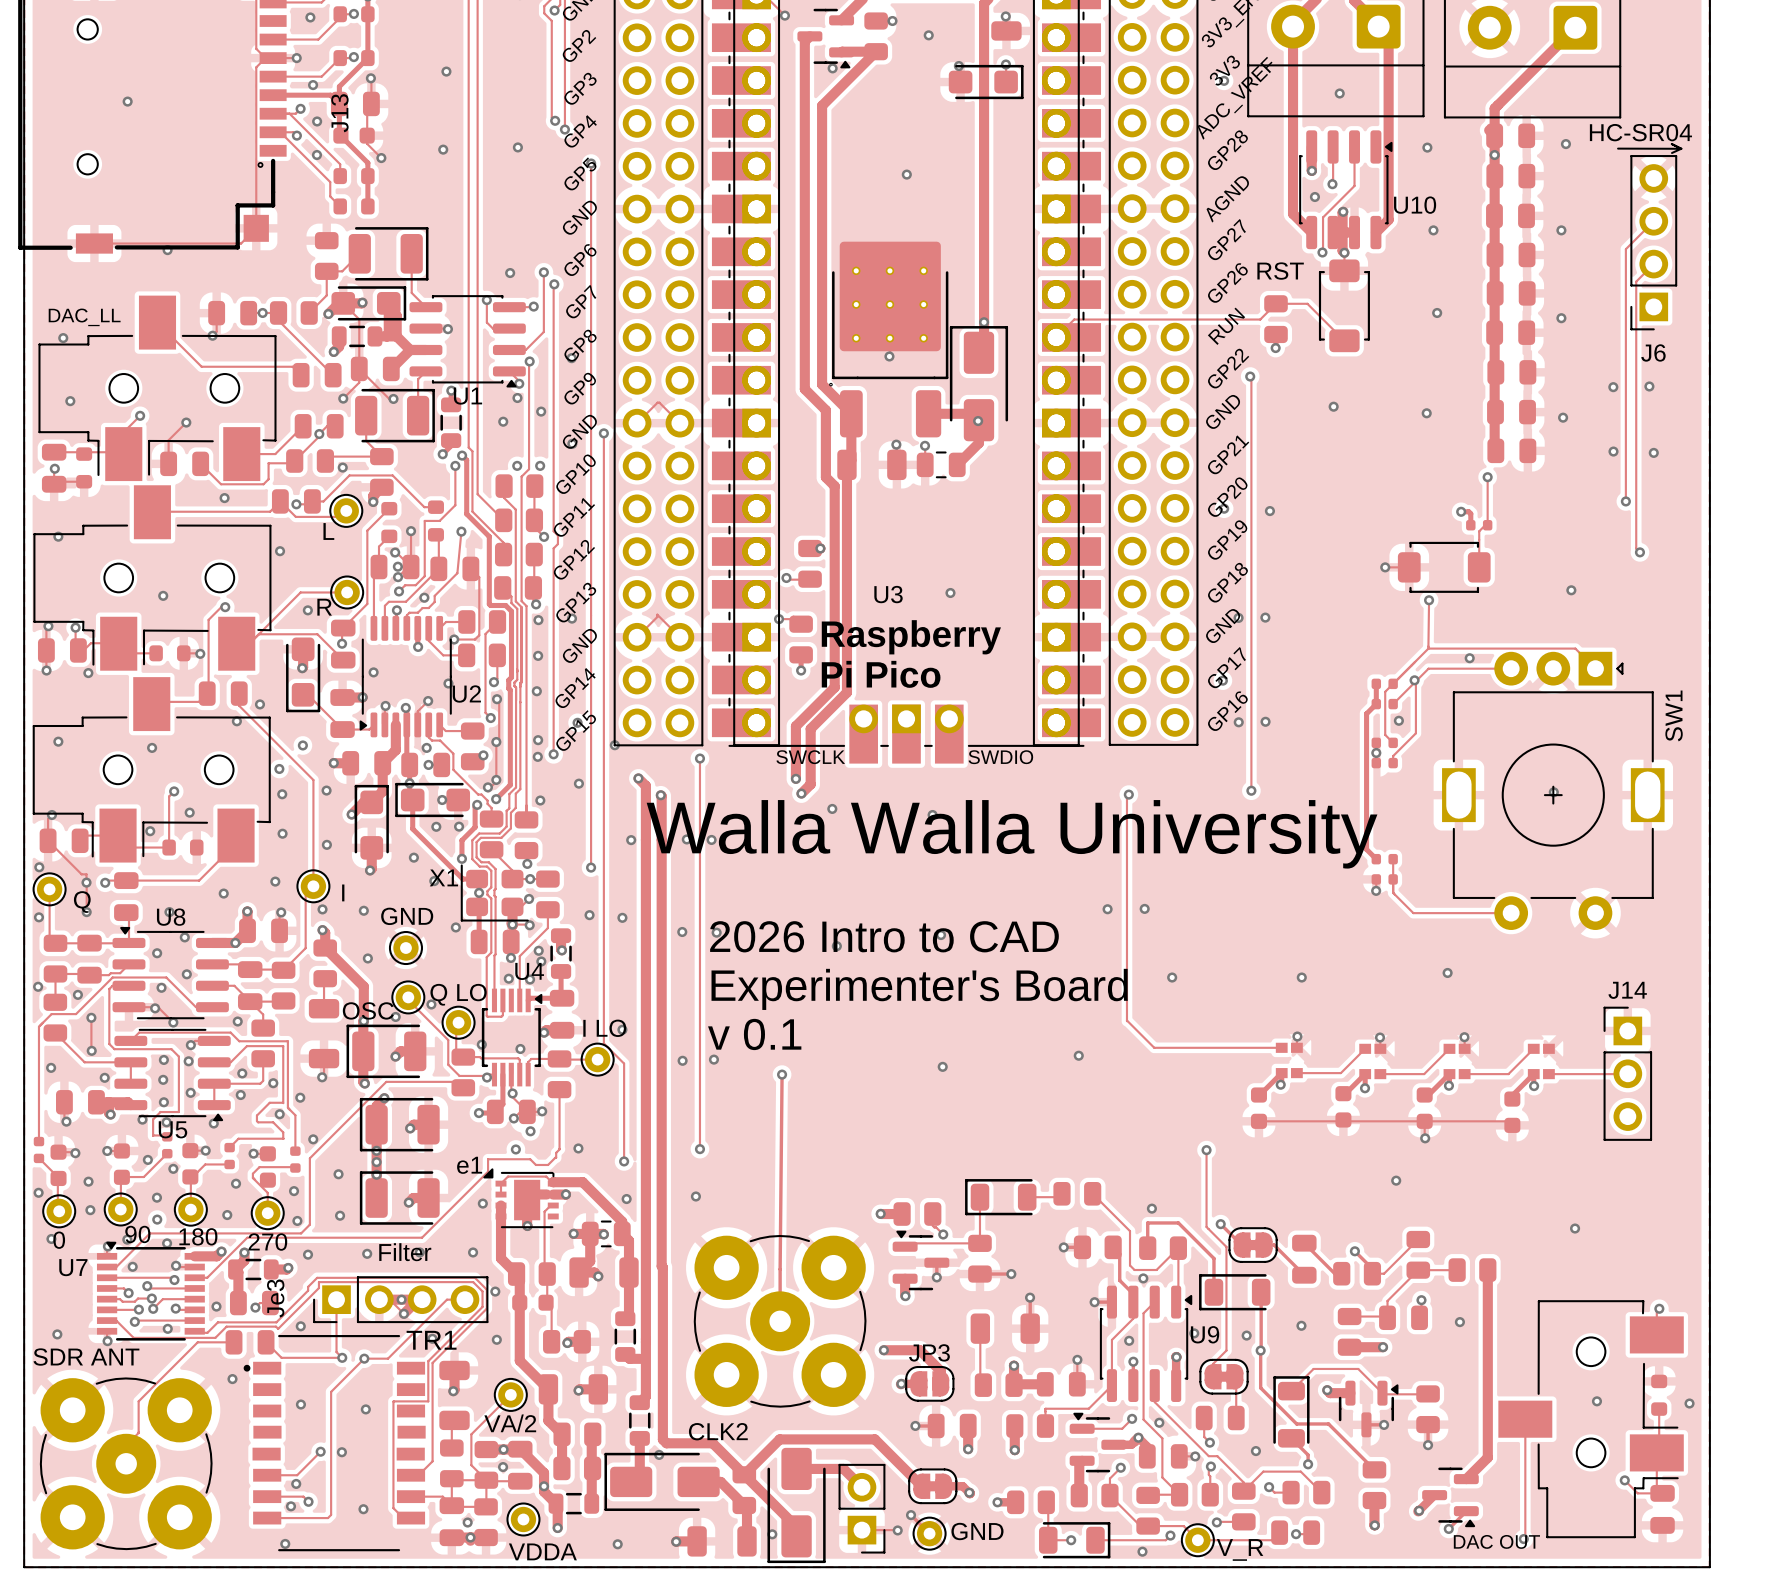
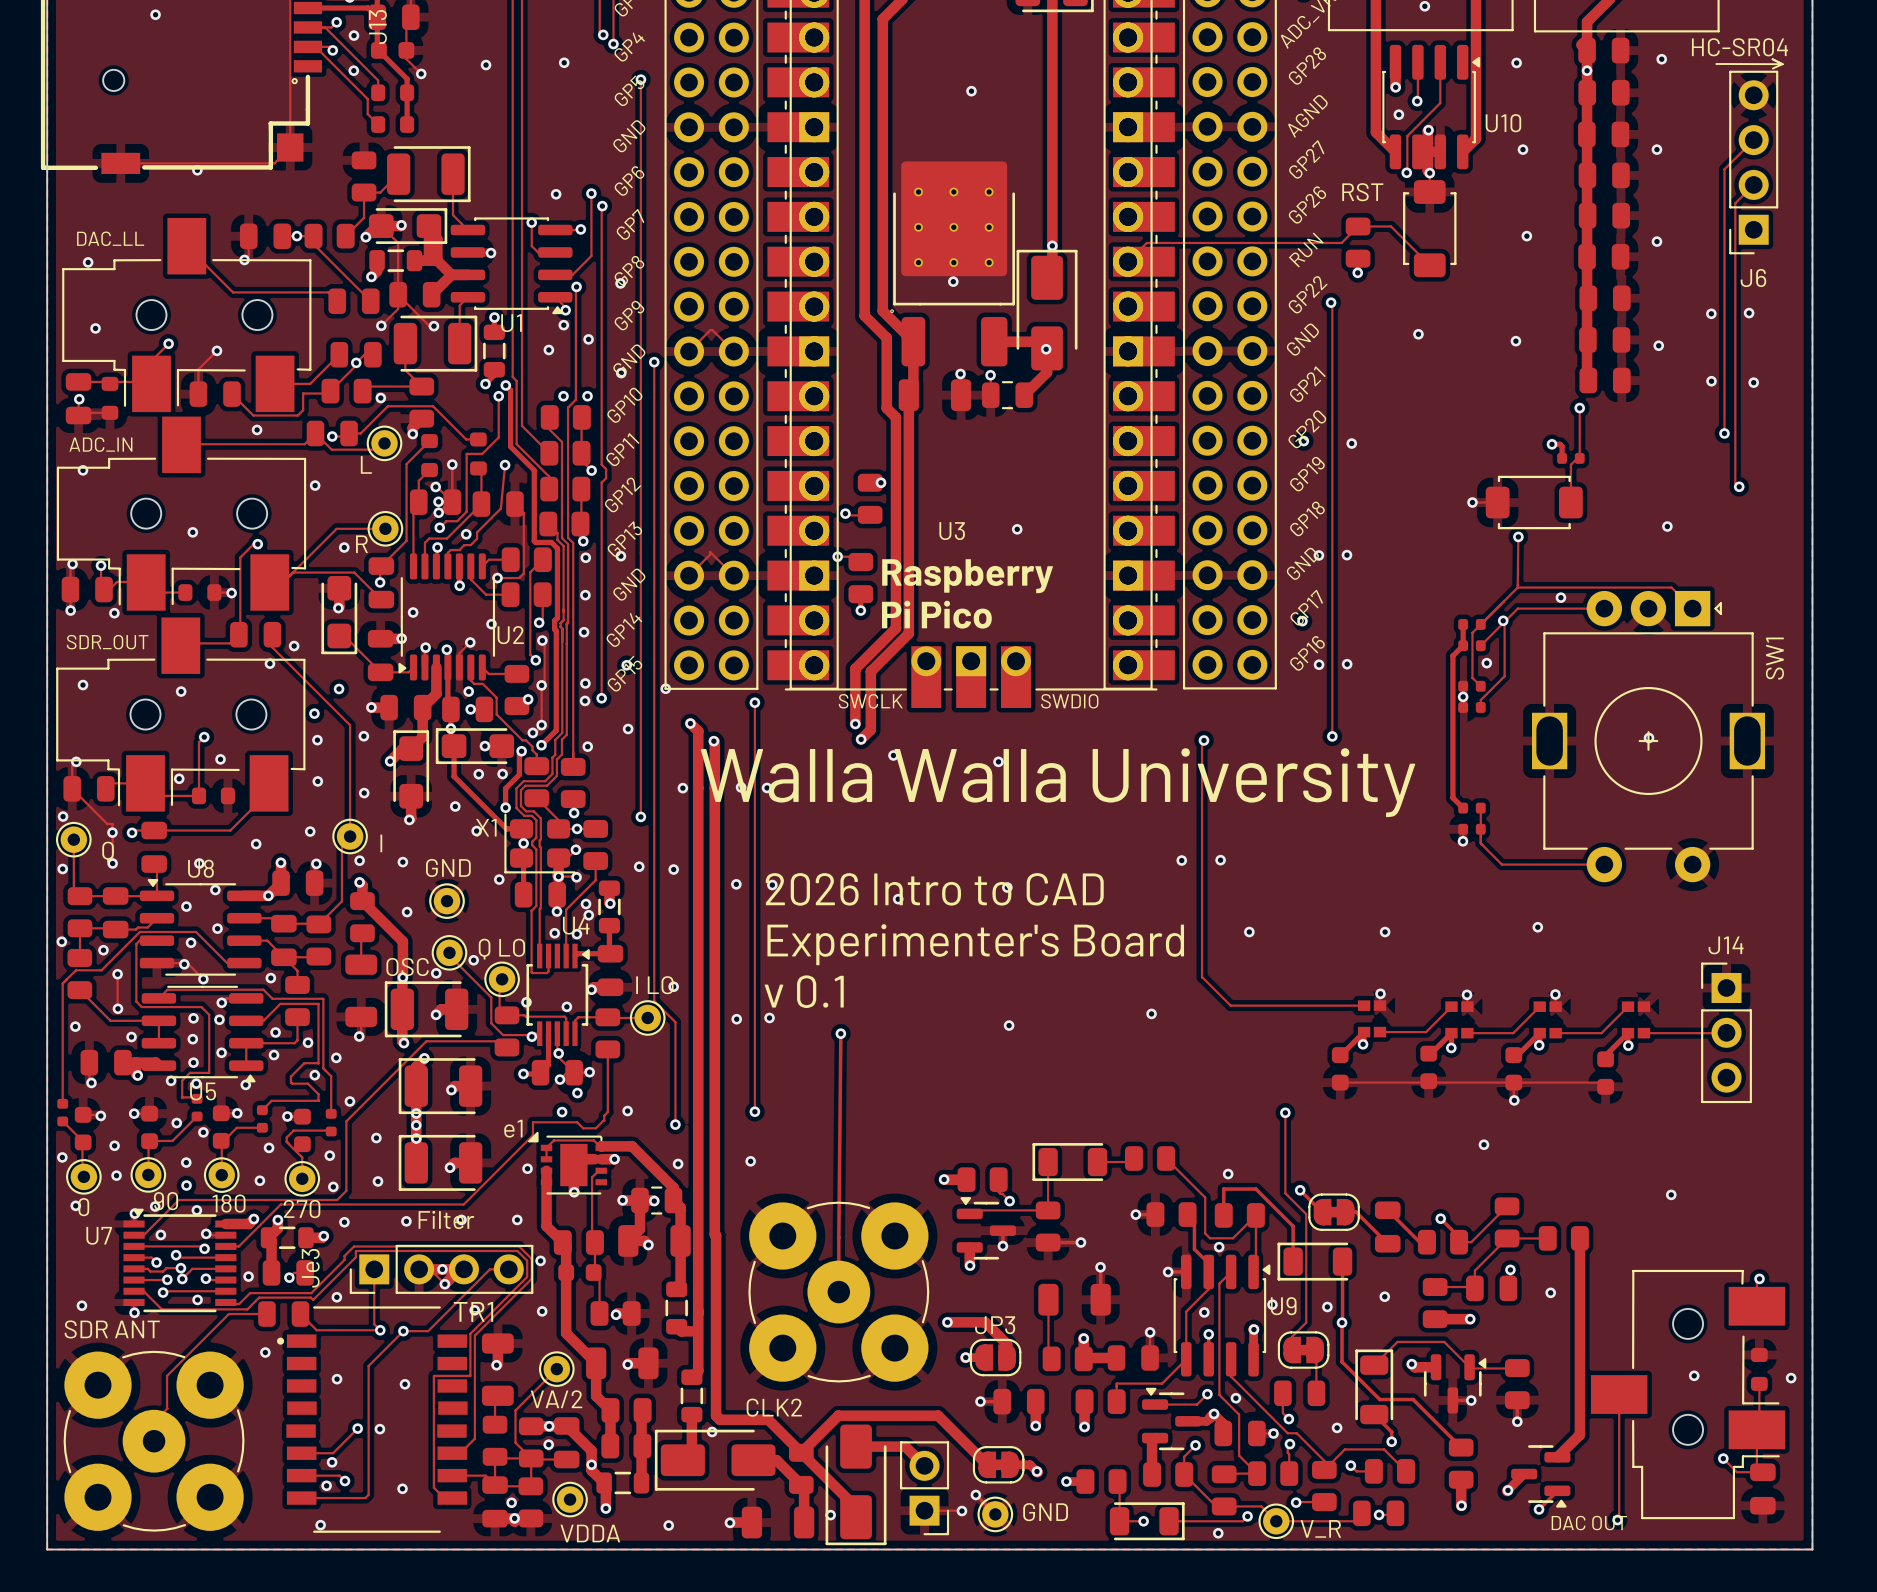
part text: none -> ADC_IN (100, 444)
part text: none -> SDR_OUT (107, 642)

